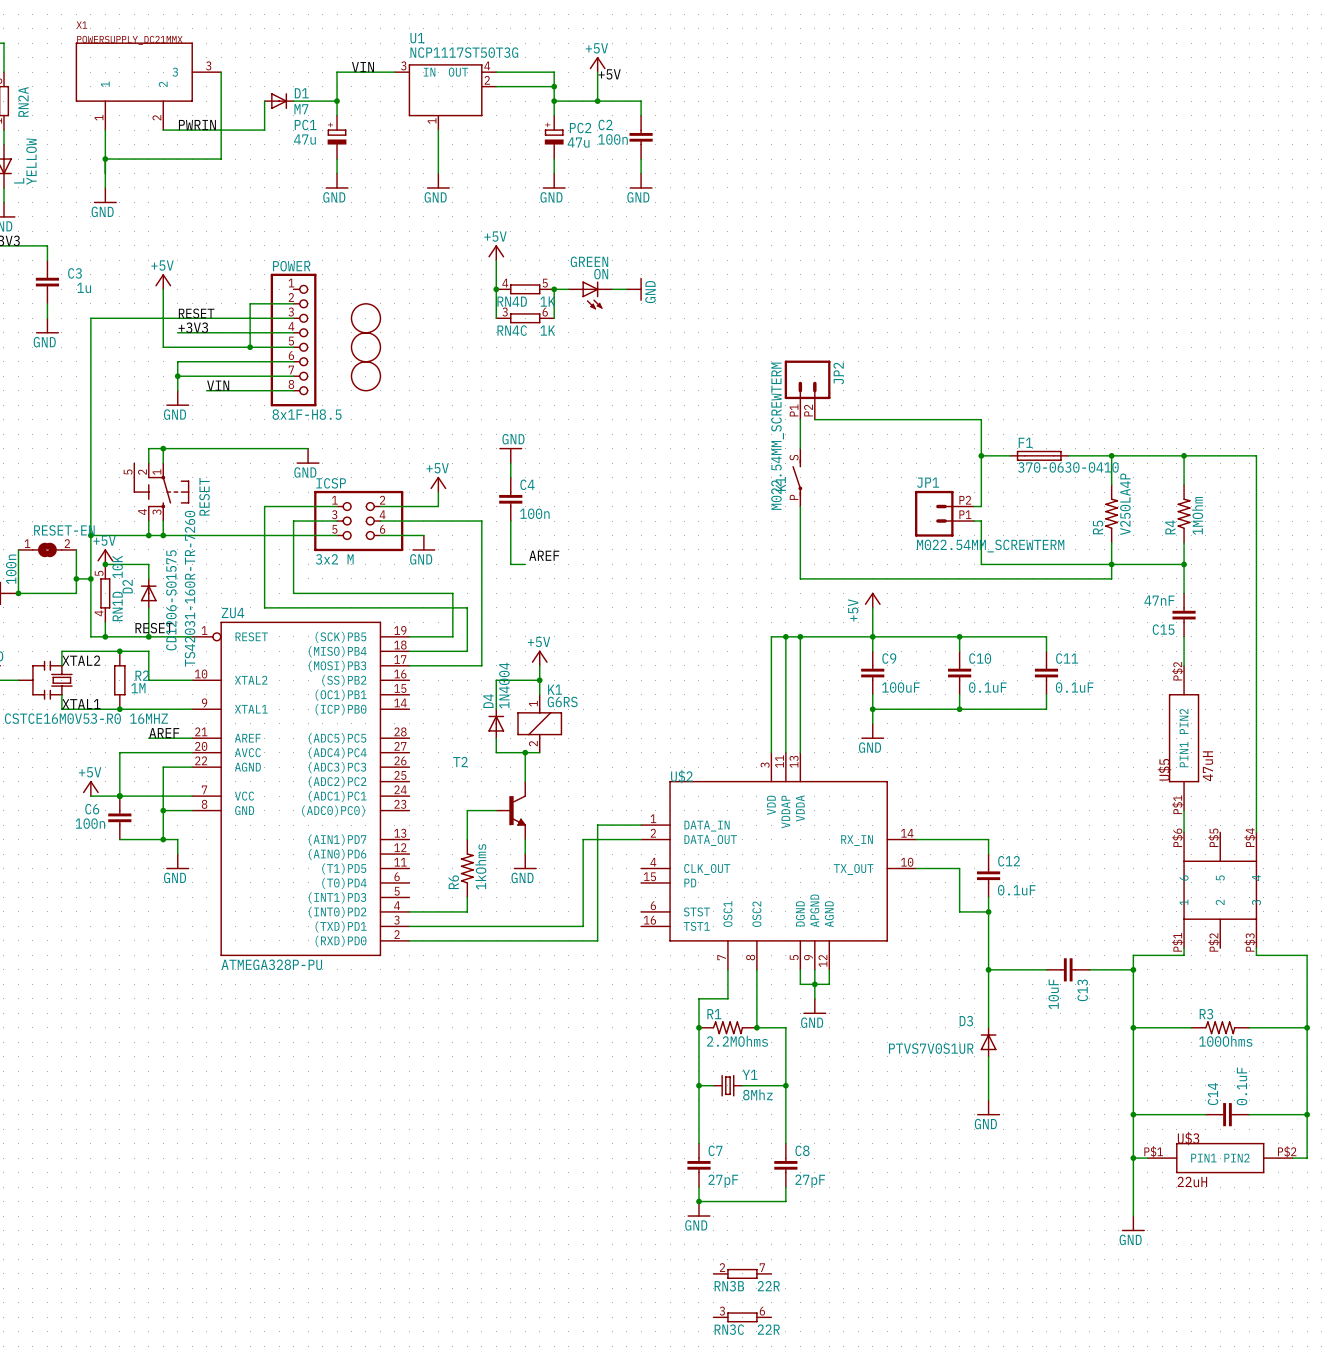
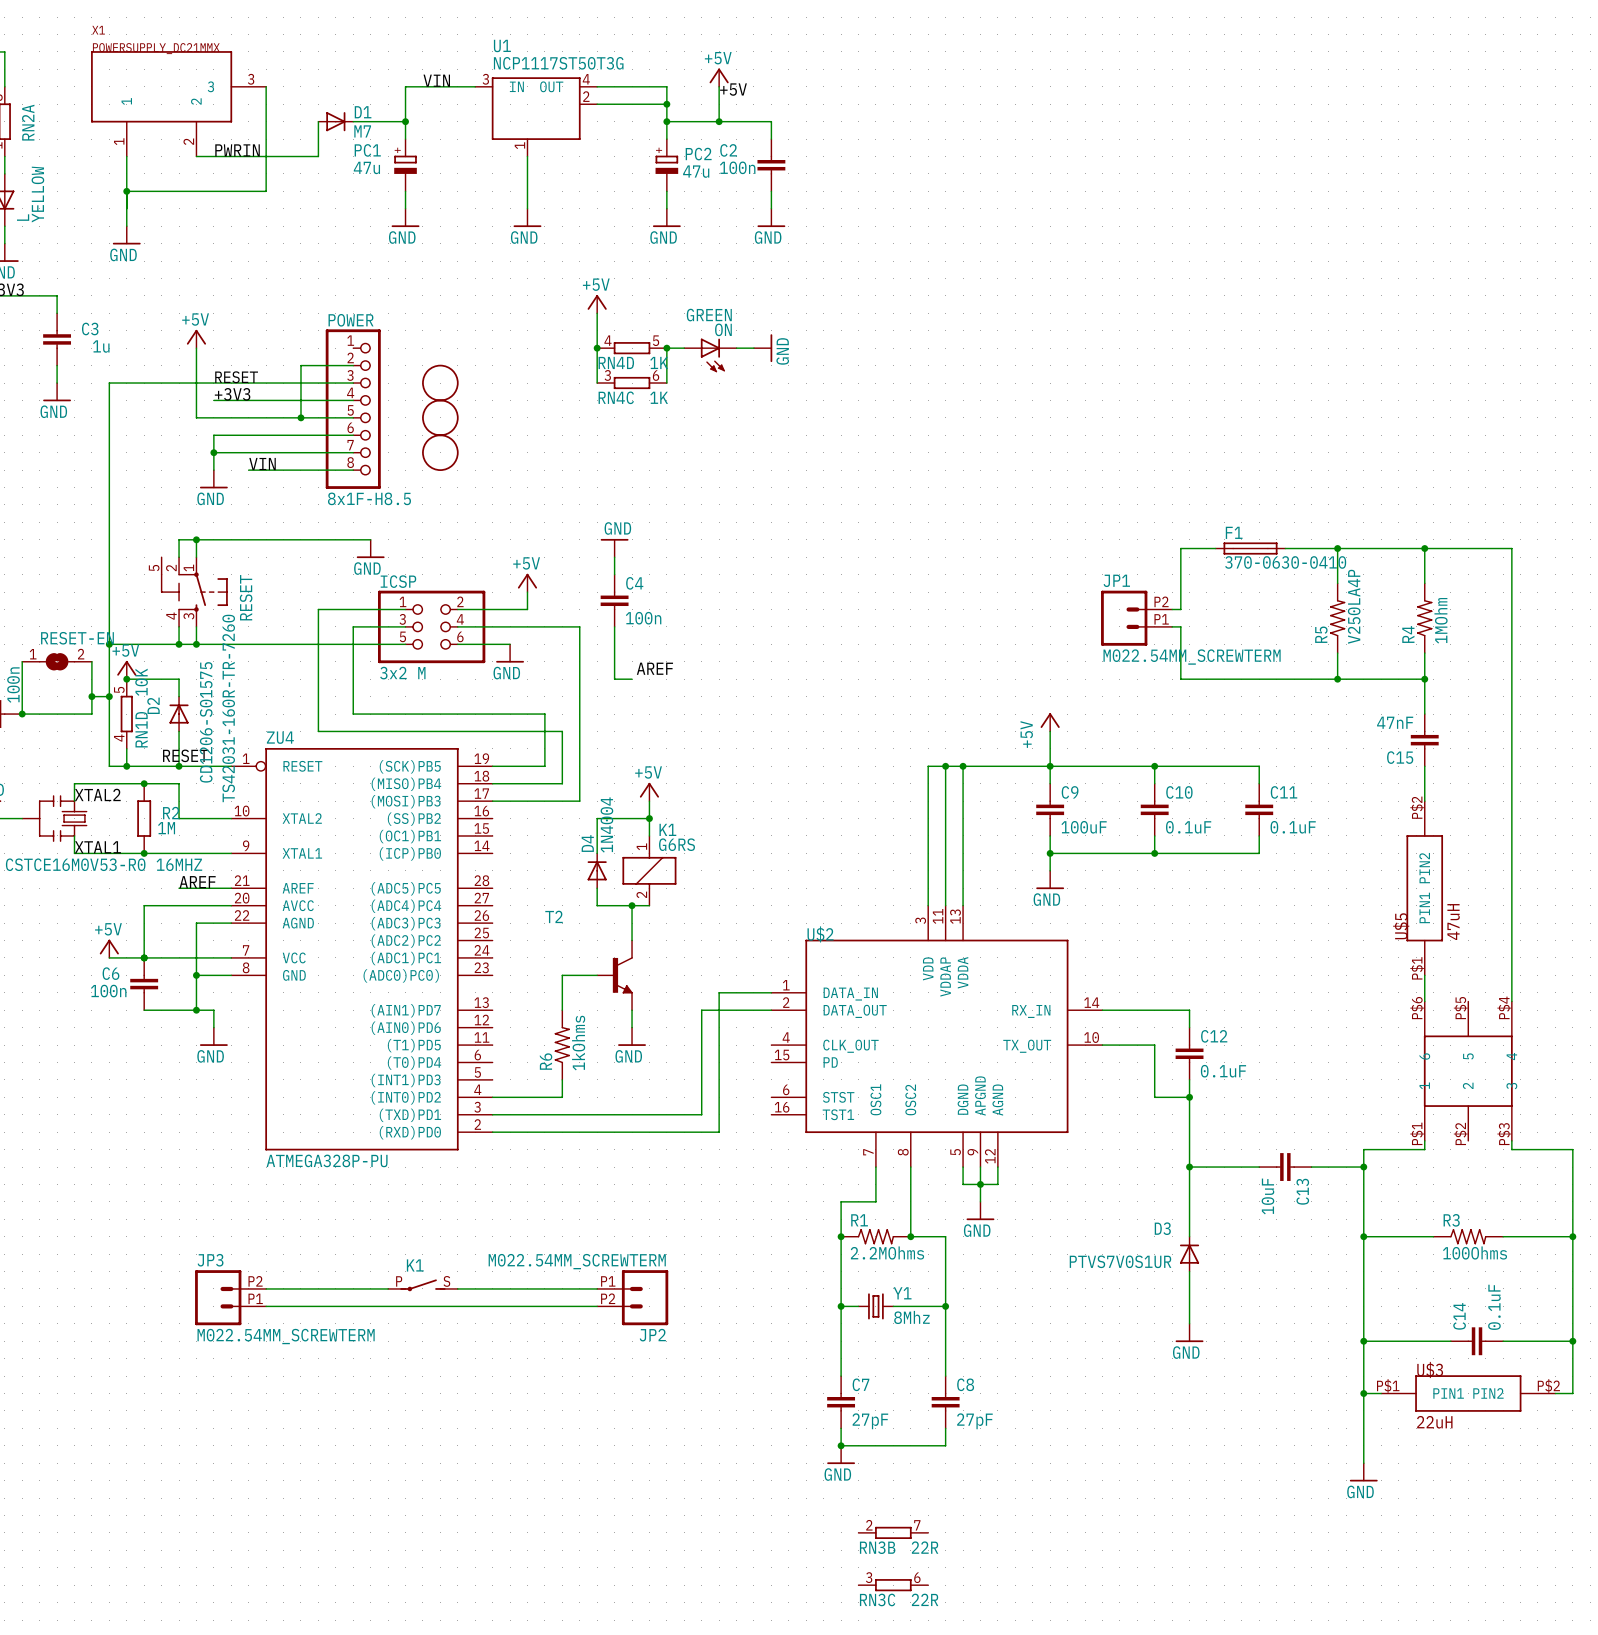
JP2 rotation: 0° (807, 379) -> 90° clockwise (645, 1297)
JP2 position: (807, 390) -> (632, 1297)
wire: (800, 419) (800, 448) -> none
wire: (814, 419) (981, 419) (981, 455) -> none
junction: (981, 455) -> none
K1: (797, 477) -> none
wire: (800, 506) (800, 578) (1111, 578) (1111, 564) -> none
K1: none -> (422, 1285)
wire: none -> (266, 1288) (388, 1288)
wire: none -> (457, 1288) (597, 1288)
JP3: none -> M022.54MM_SCREWTERM (230, 1297)
wire: none -> (266, 1306) (597, 1306)

